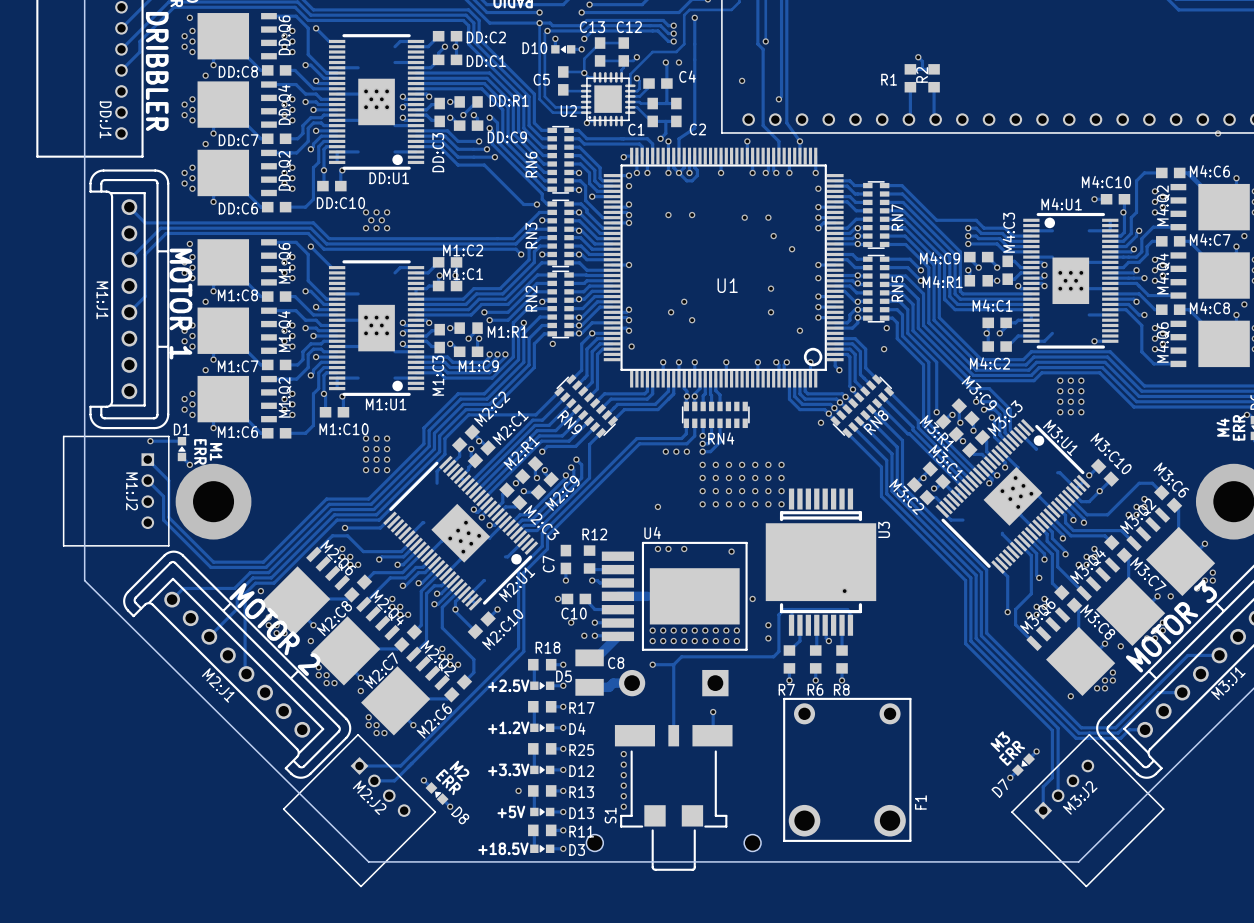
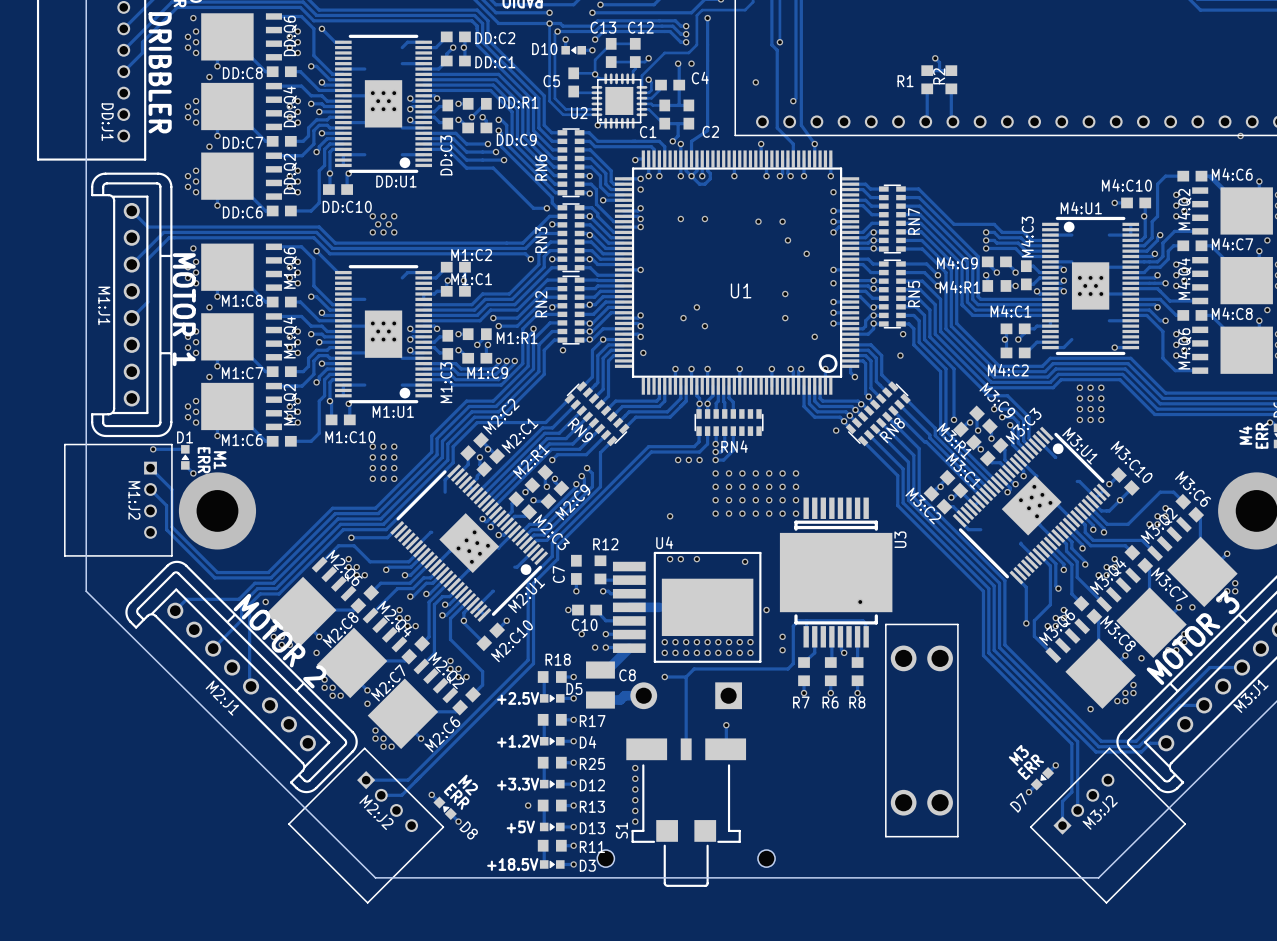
part: none -> (921, 730)
F1: (847, 769) -> none

